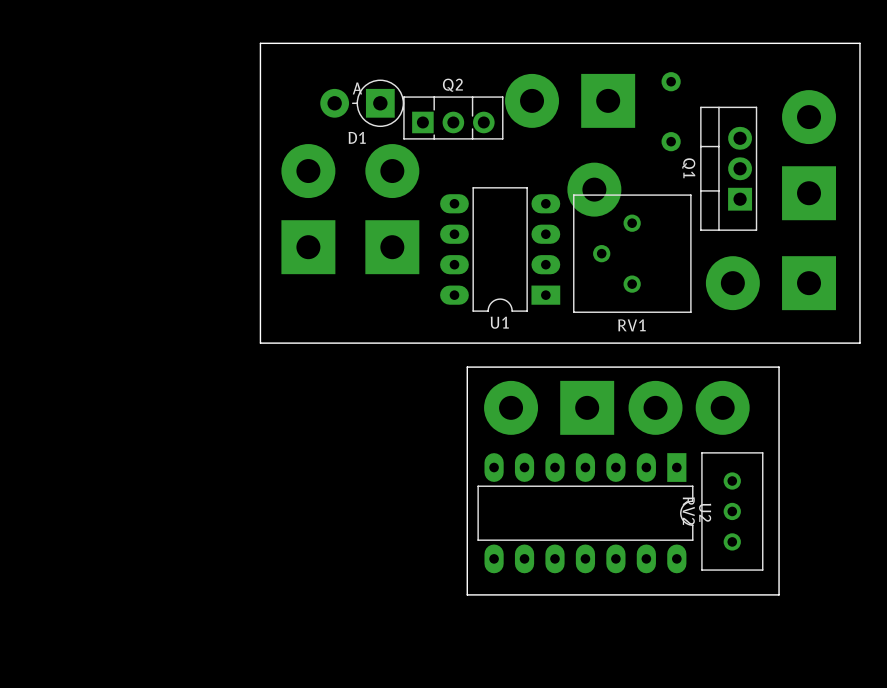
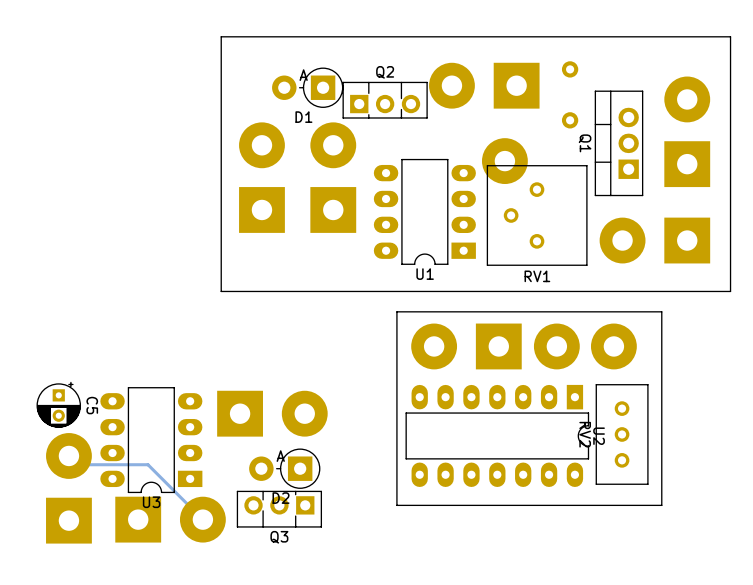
C5: none -> (58, 404)
part: none -> (272, 413)
U3: none -> (151, 440)
track: none -> (68, 455) (77, 464) (147, 464) (202, 519)
D2: none -> (284, 468)
part: none -> (68, 488)
Q3: none -> (279, 509)
part: none -> (170, 519)

